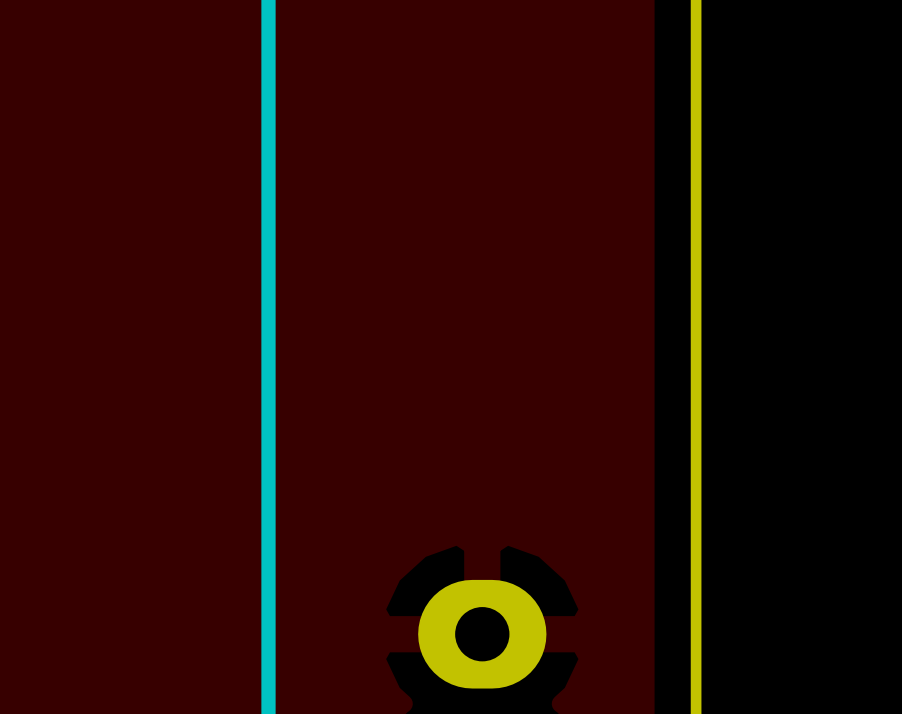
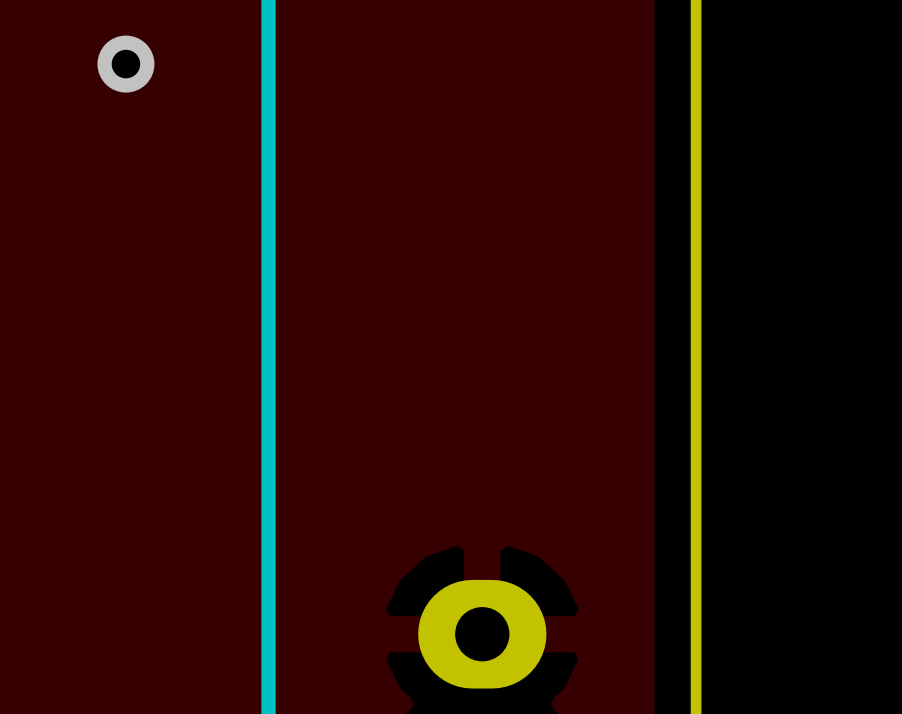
via: none -> (125, 64)

